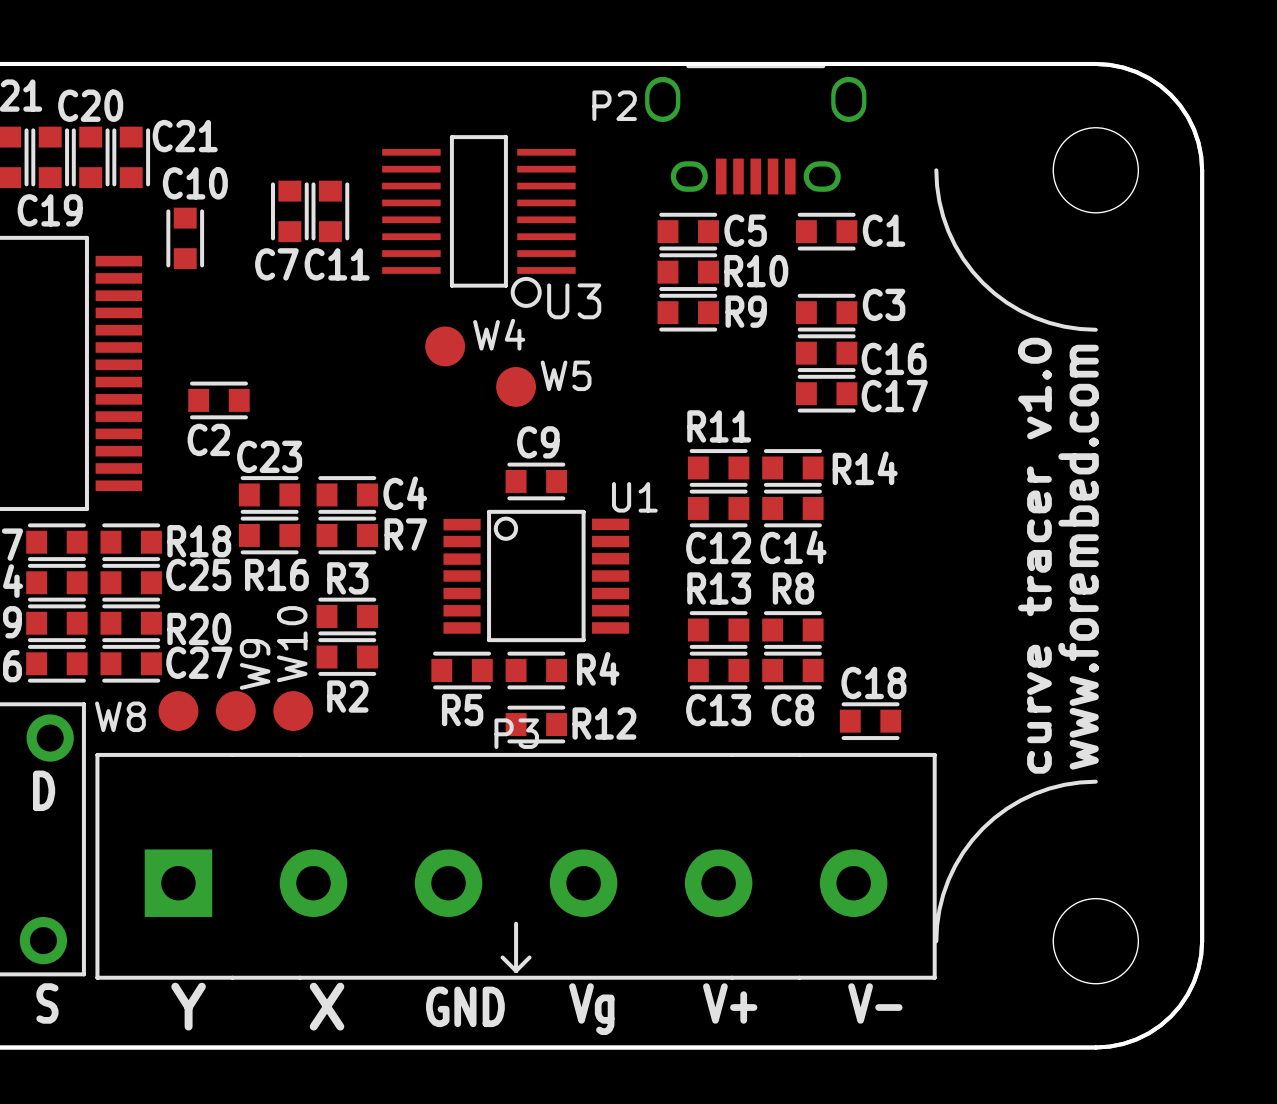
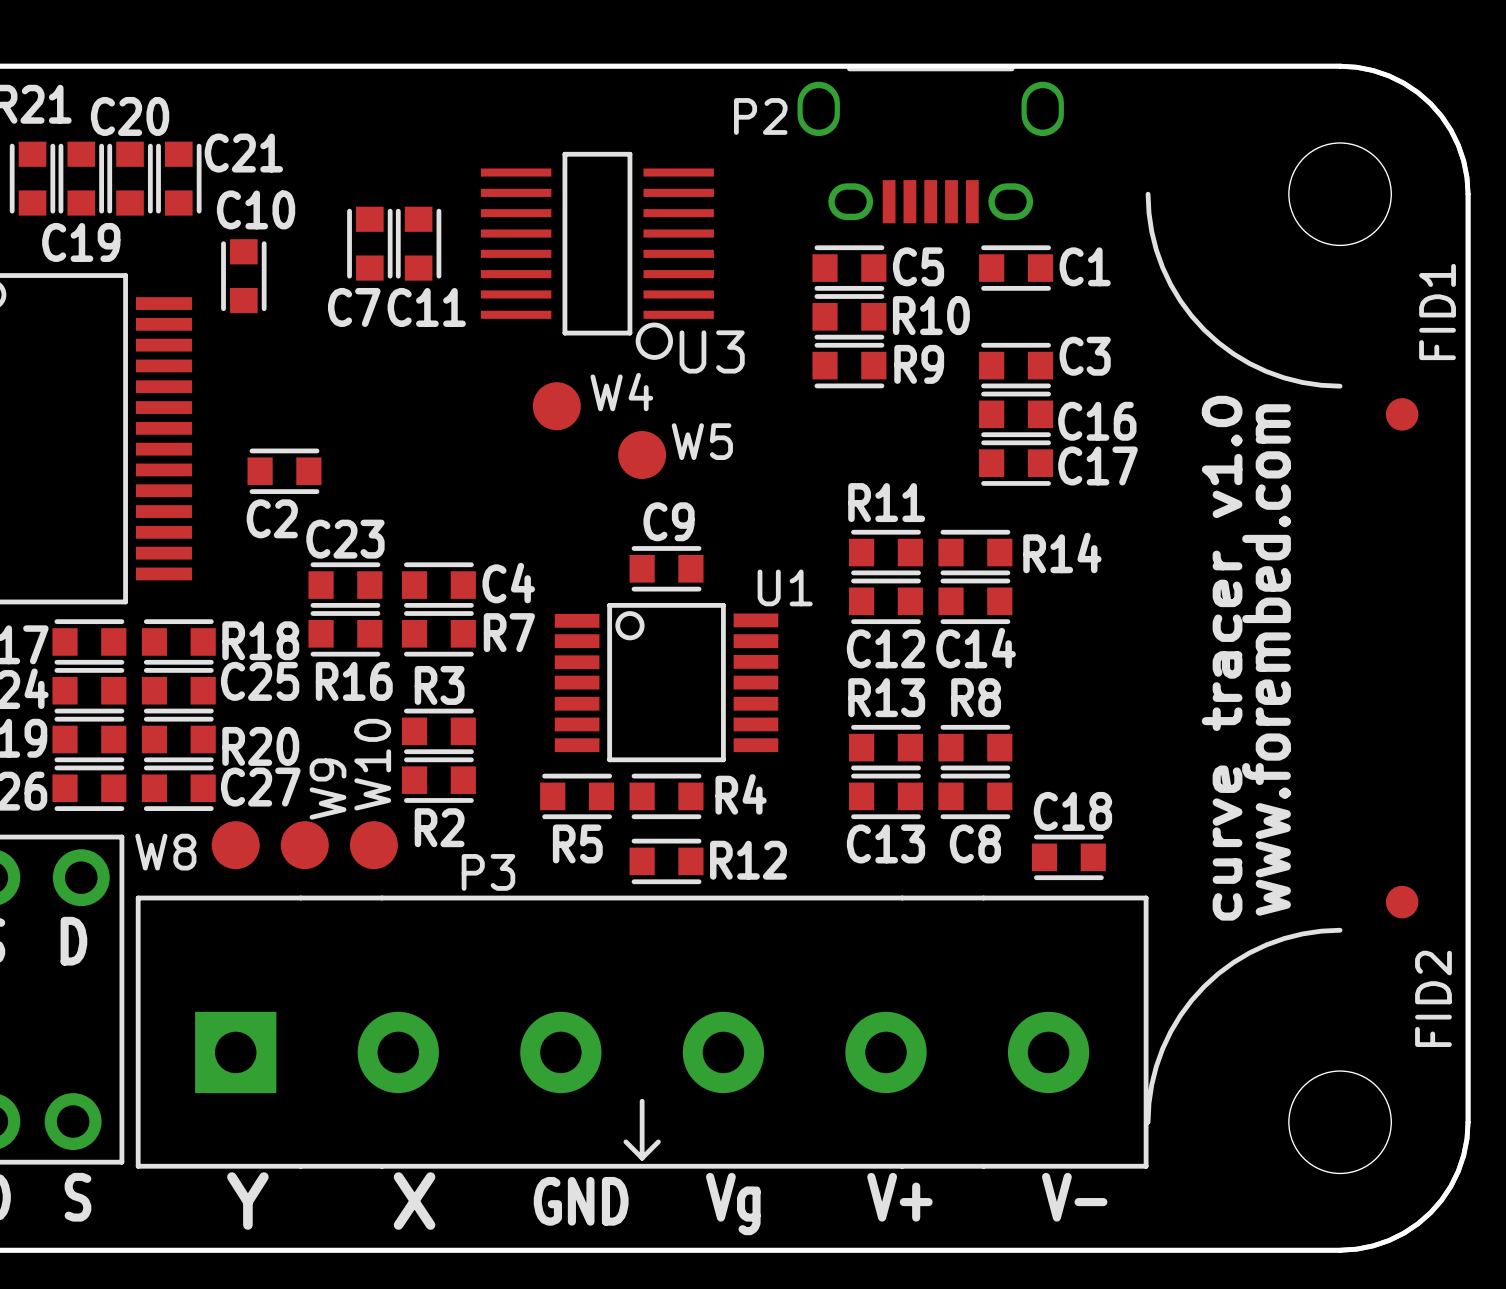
FID1: none -> (1402, 414)
text: none -> curve tracer v1.0 (1222, 658)
text: curve tracer v1.0 (1034, 555) -> www.forembed.com (1266, 659)
text: www.forembed.com (1078, 557) -> none
P3 name position: P3 (516, 733) -> P3 (488, 872)
FID2: none -> (1402, 902)

